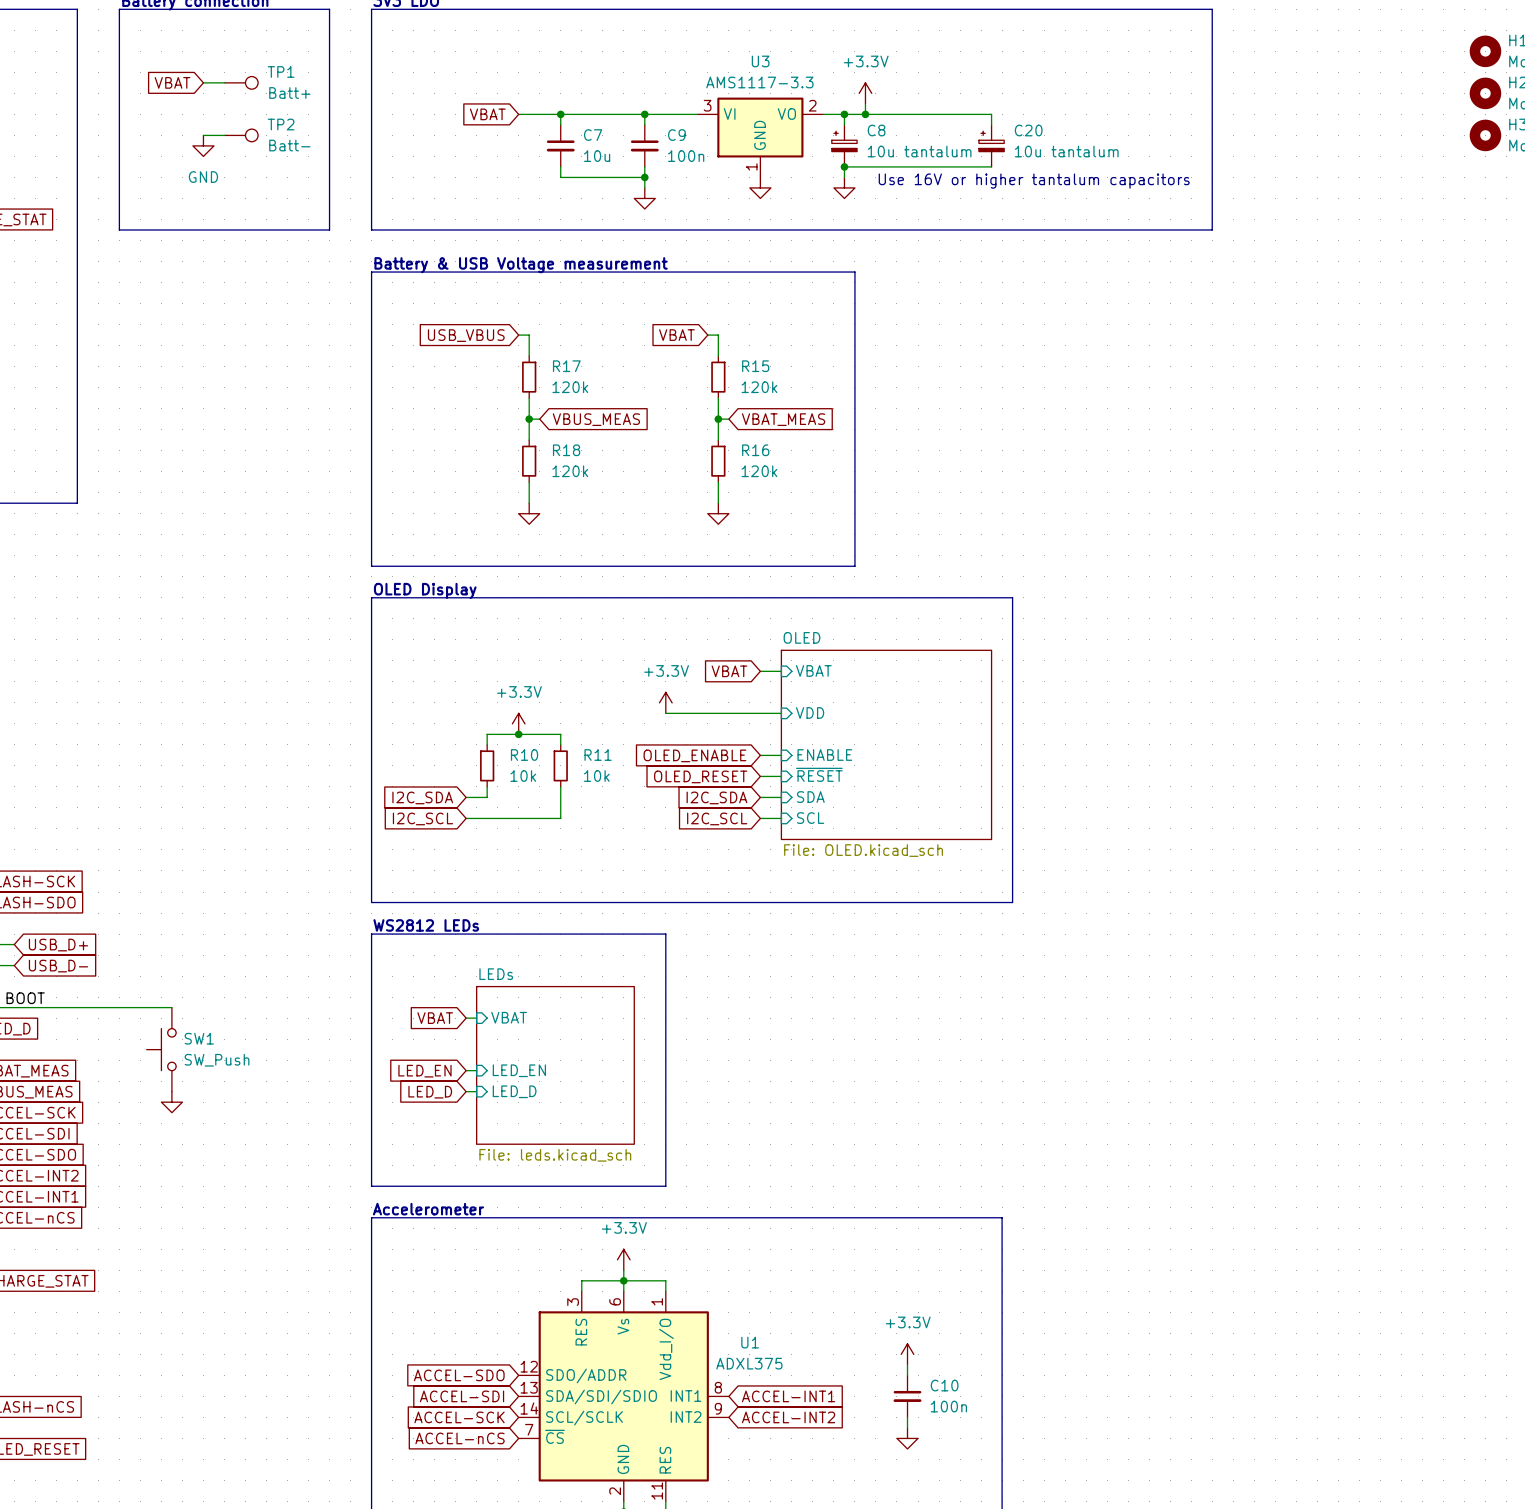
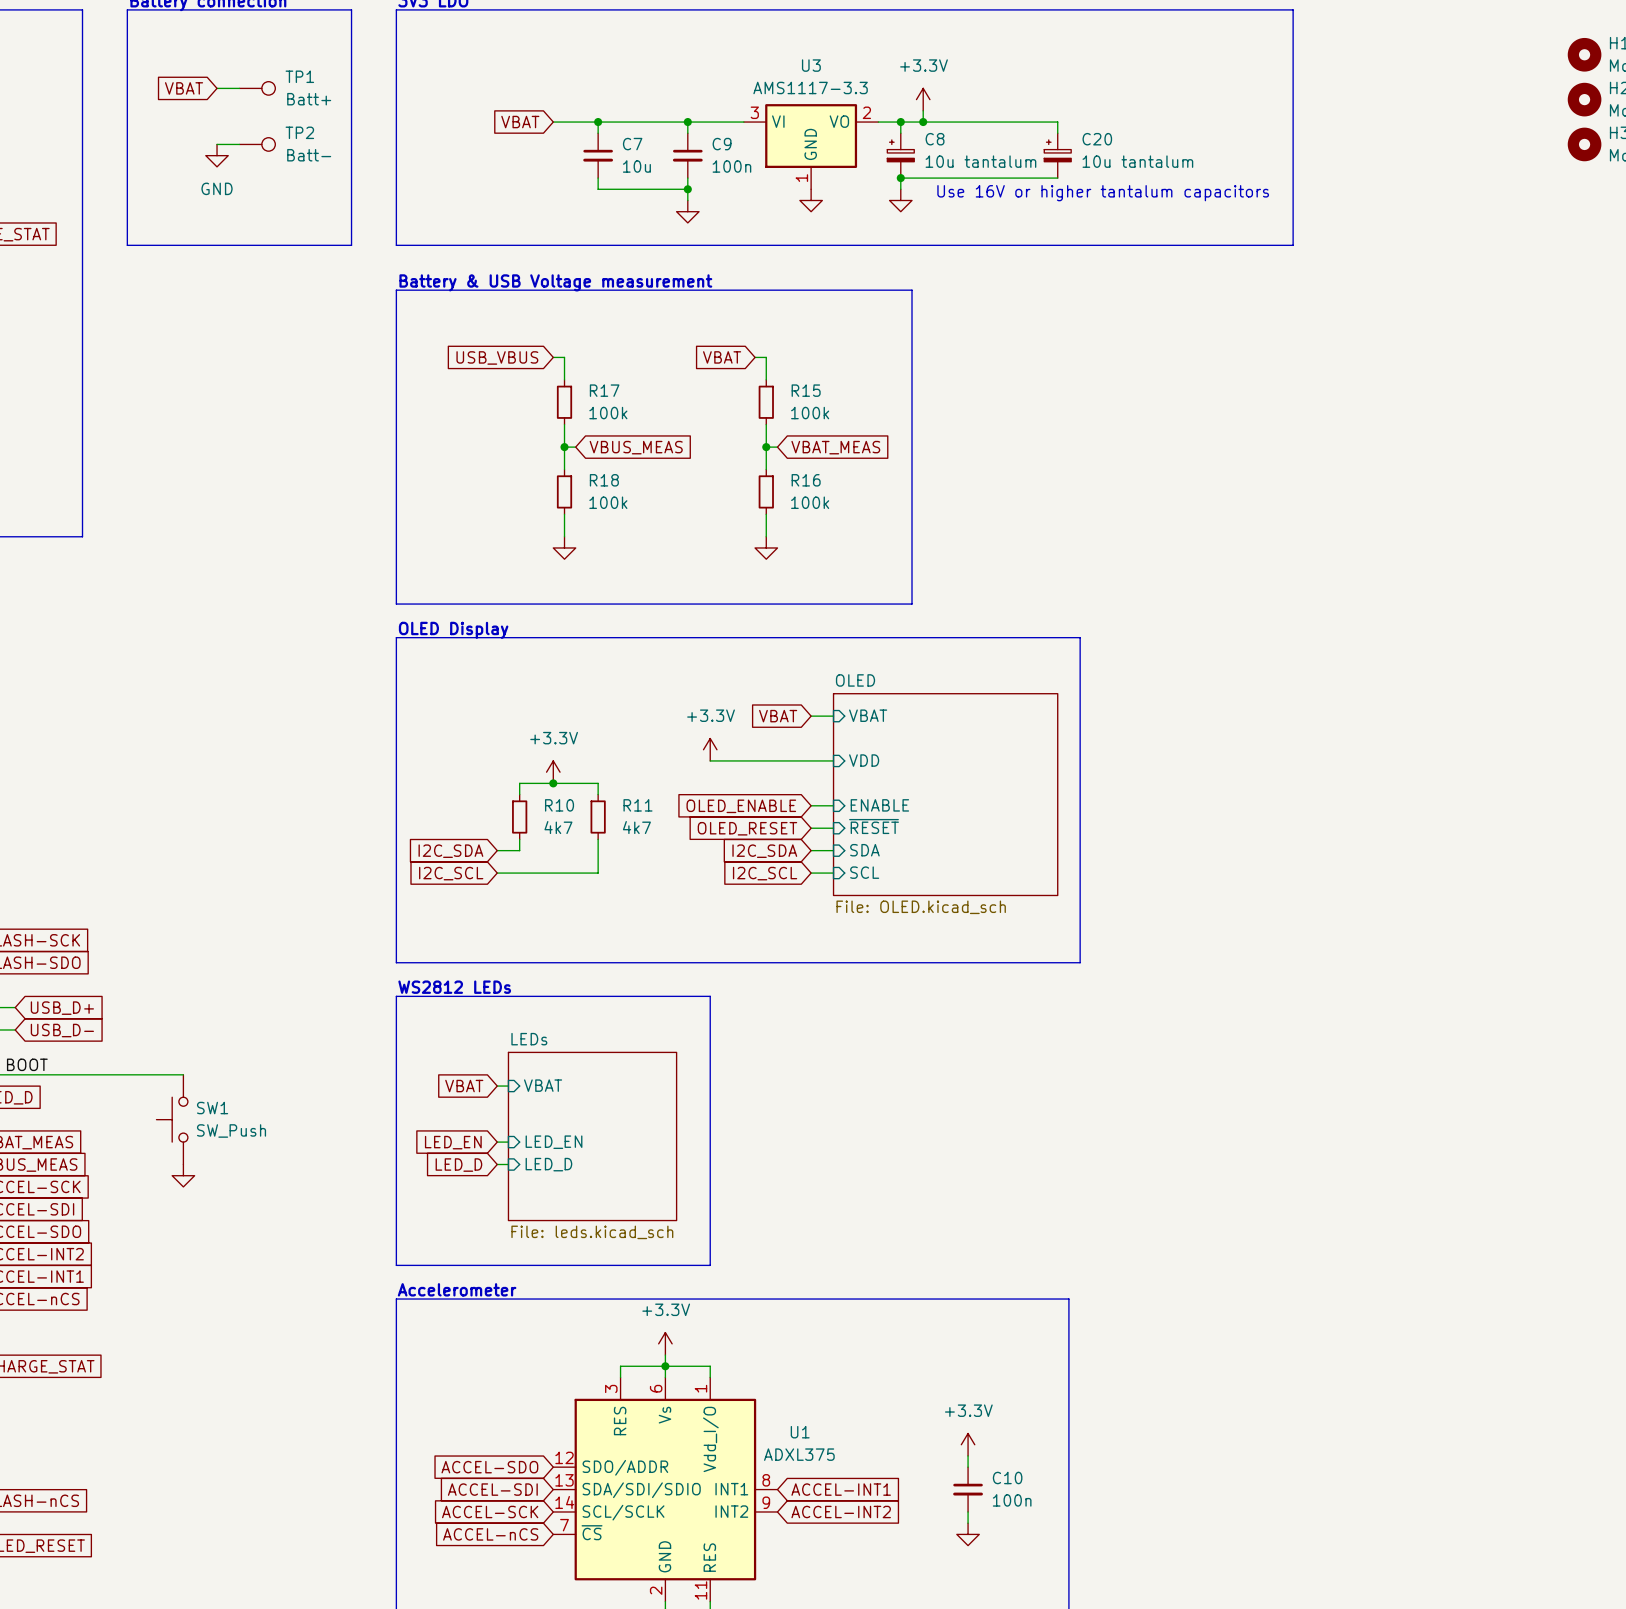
R17 value: 120k (570, 387) -> 100k (608, 413)
R15 value: 120k (759, 387) -> 100k (810, 413)
R18 value: 120k (570, 471) -> 100k (608, 502)
R16 value: 120k (759, 471) -> 100k (810, 502)
R10 value: 10k (523, 776) -> 4k7 (558, 827)
R11 value: 10k (596, 776) -> 4k7 (636, 827)

